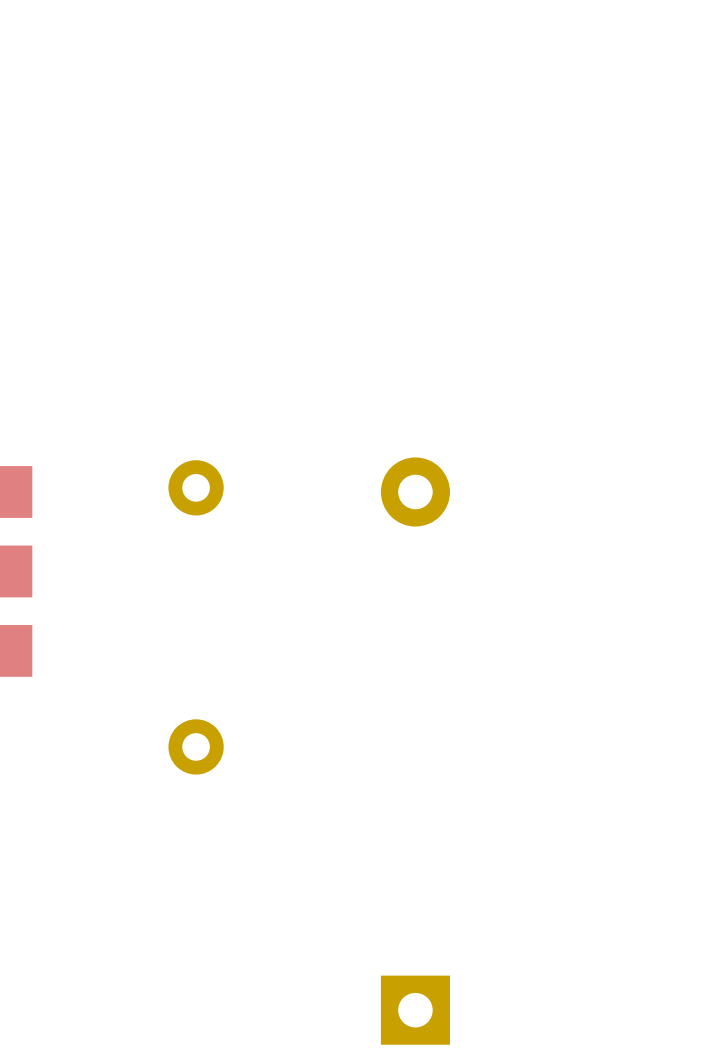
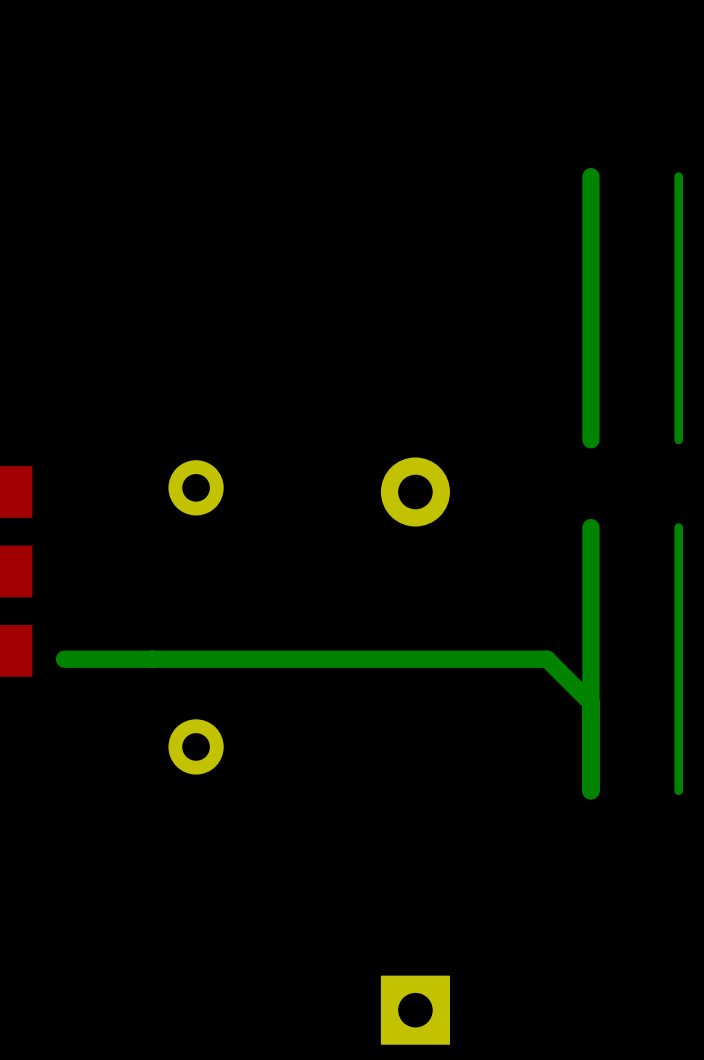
bottom track: none -> (590, 176) (590, 439)
bottom track: none -> (678, 176) (678, 439)
bottom track: none -> (590, 527) (590, 790)
bottom track: none -> (678, 527) (678, 790)
bottom track: none -> (64, 659) (547, 659) (590, 703)

